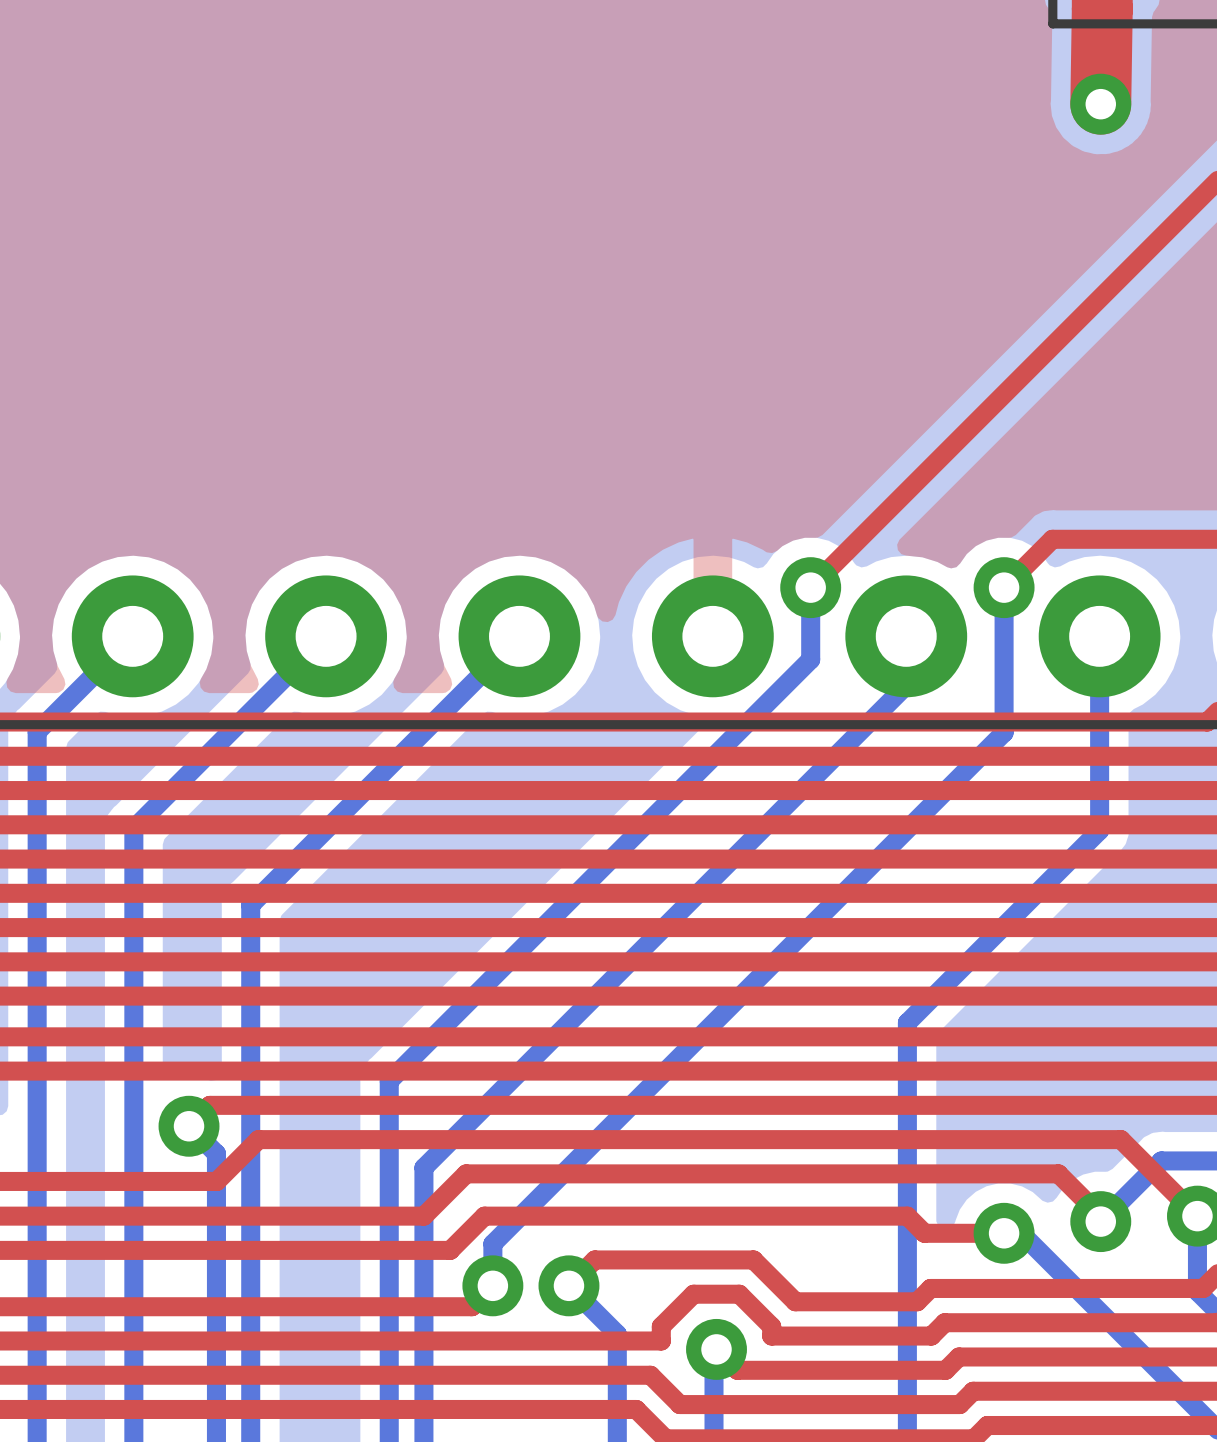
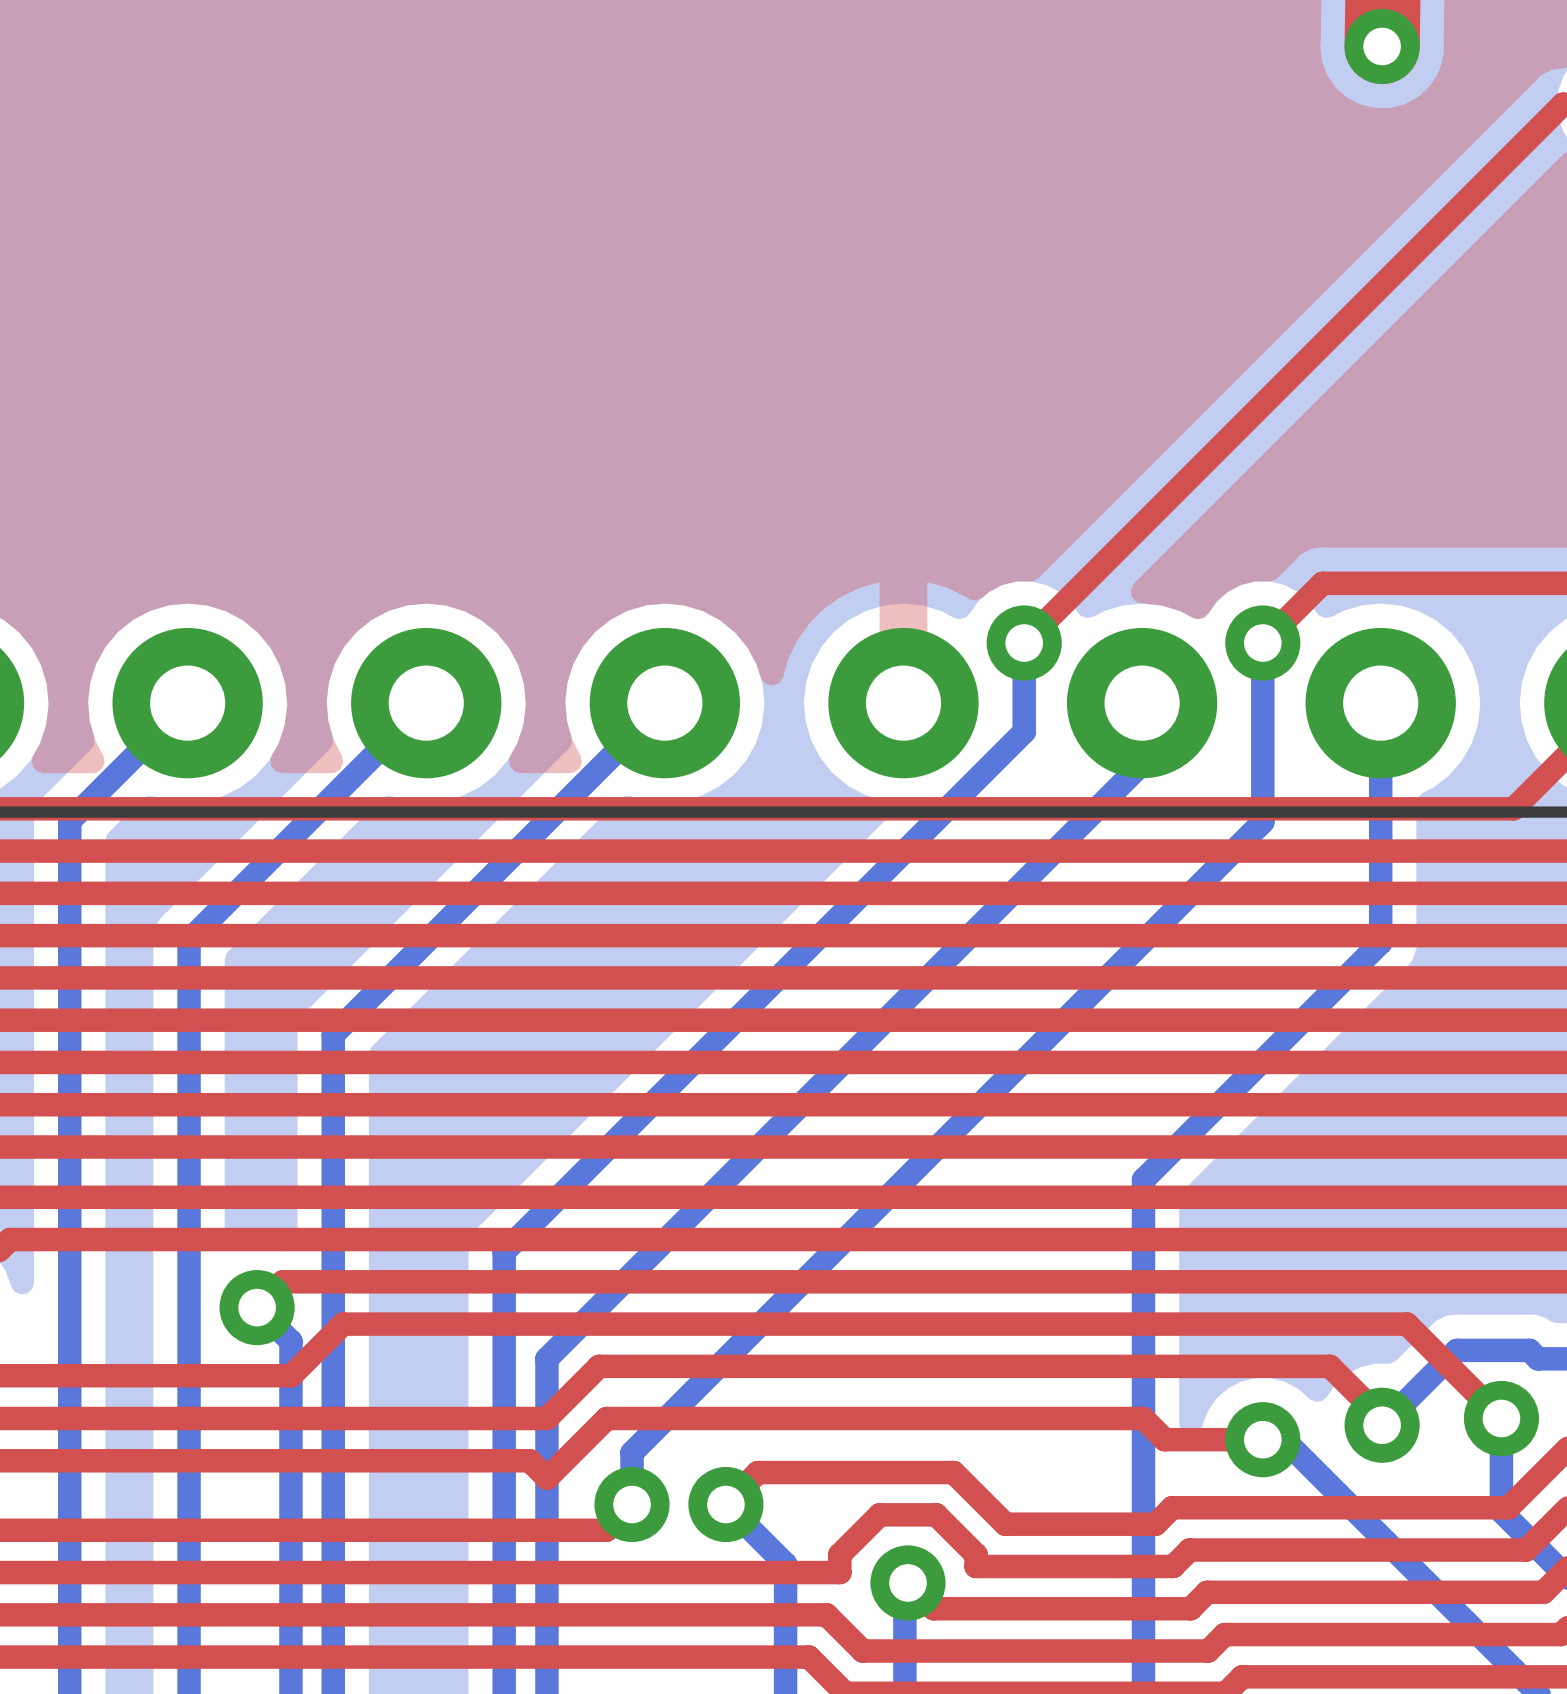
top track: (484, 1216) (450, 1250) (409, 1250) -> (621, 1418) (606, 1418) (547, 1478) (529, 1460)

